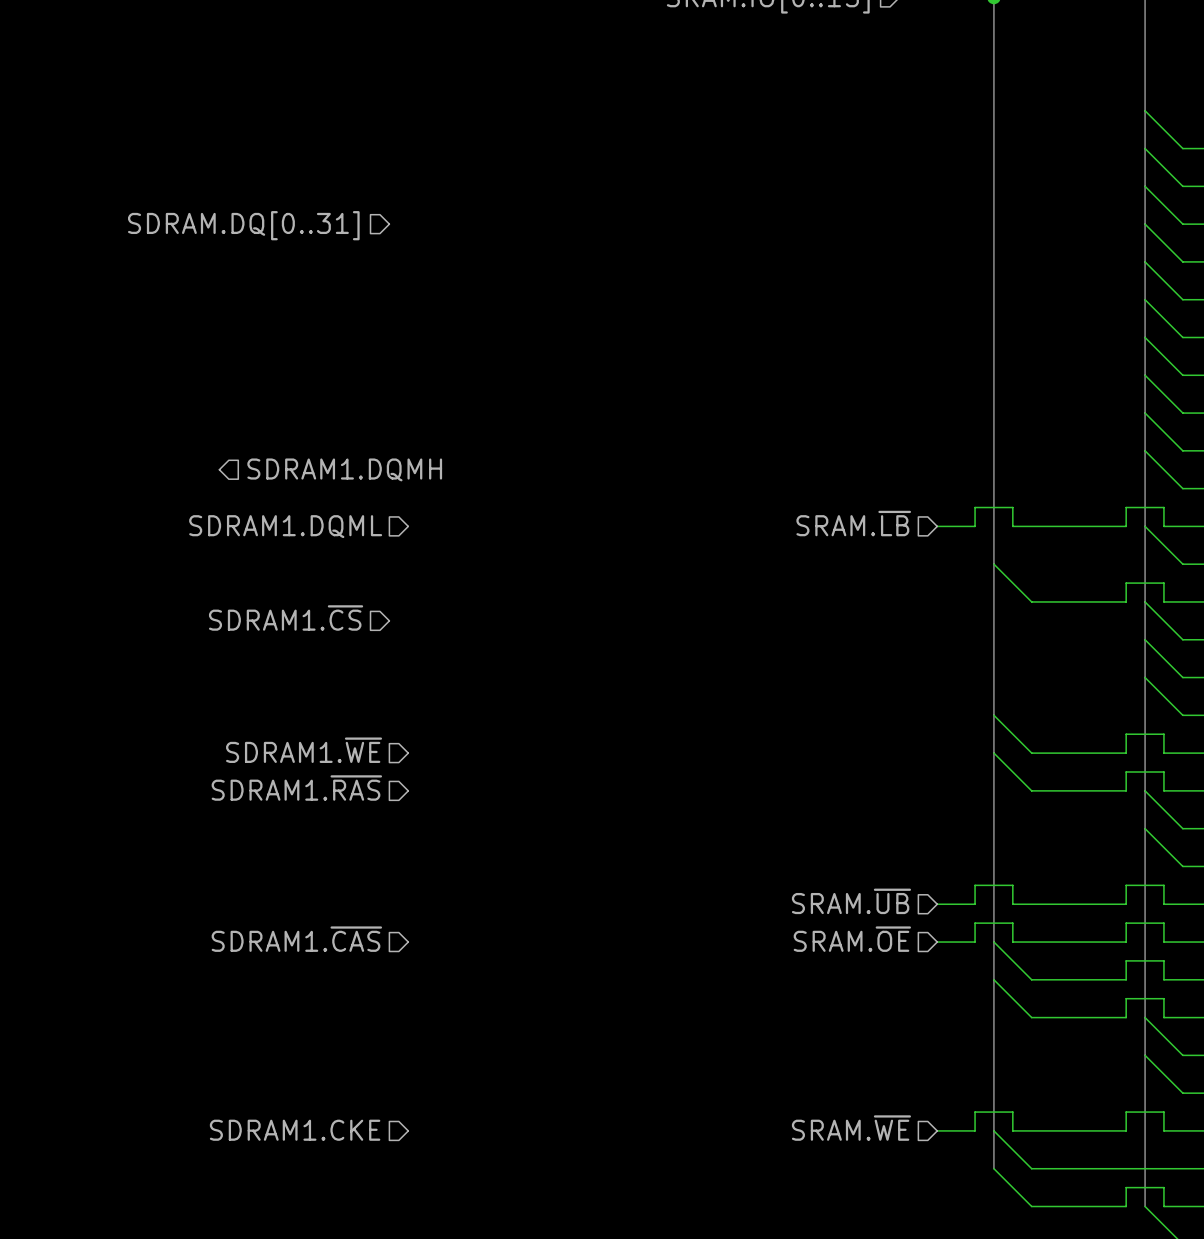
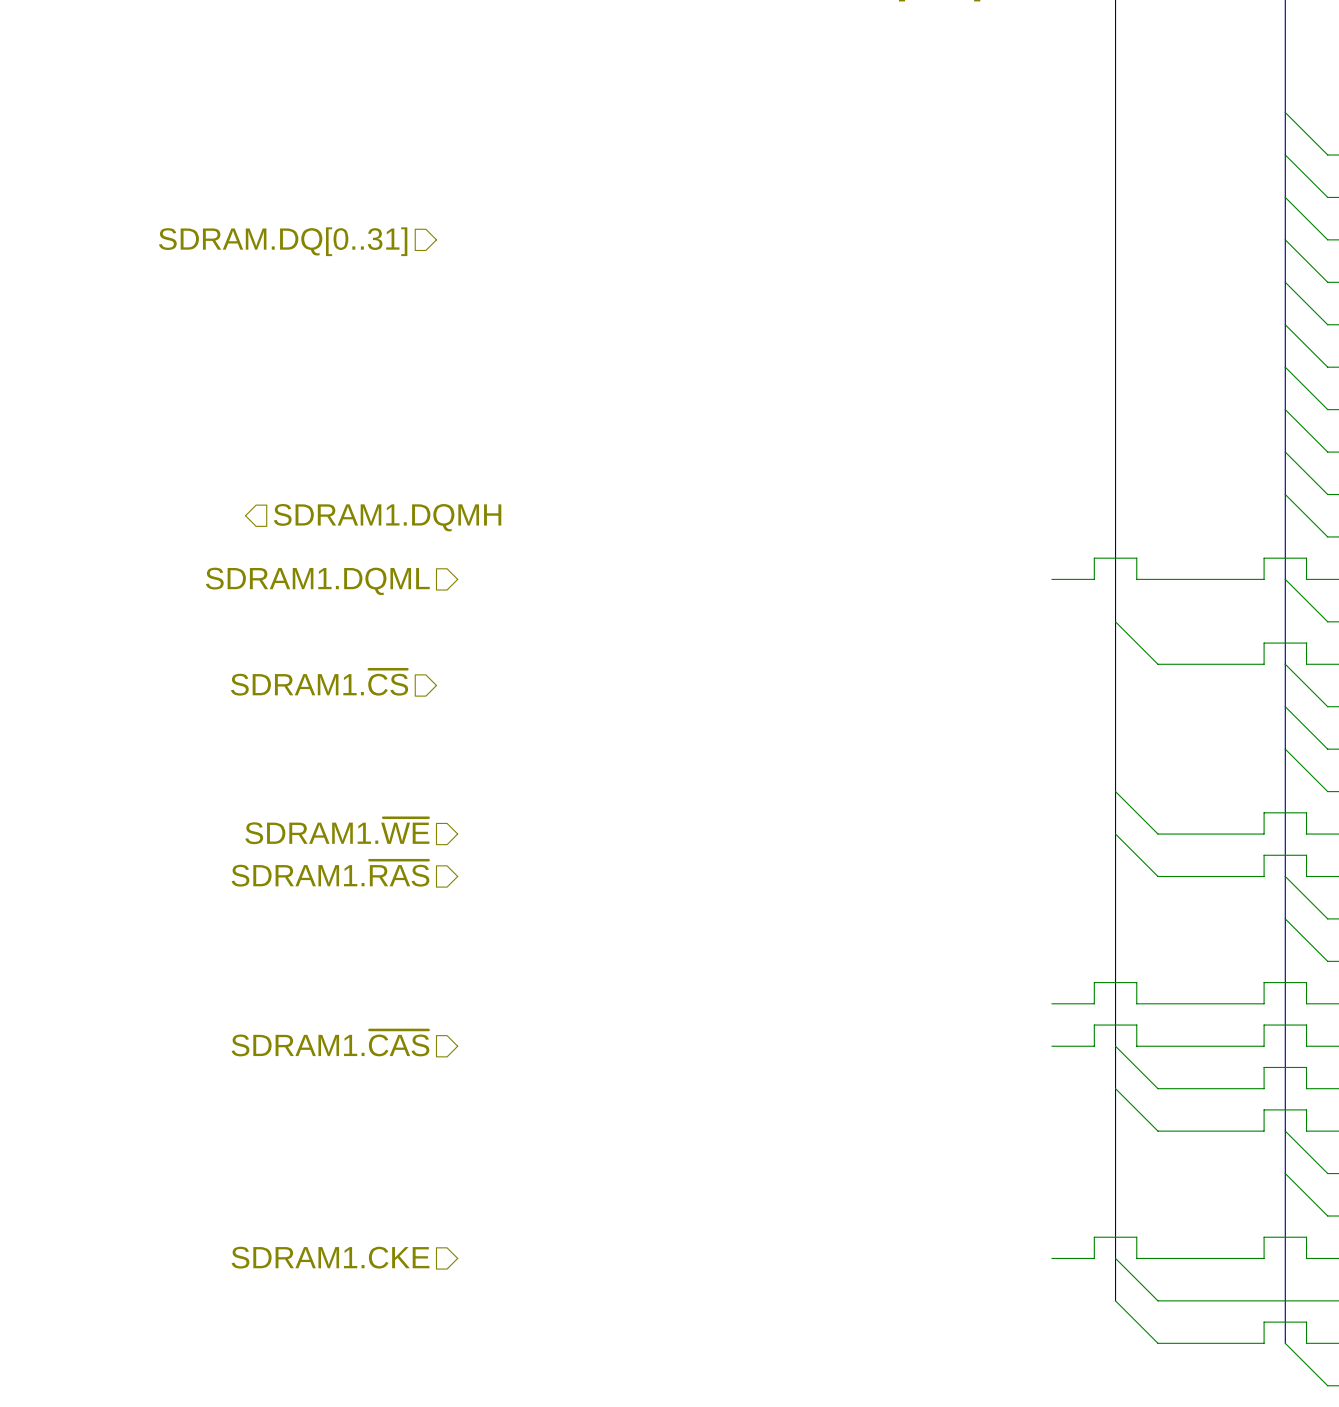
hierarchical label: SRAM.~{LB} (853, 523) -> none
hierarchical label: SRAM.~{UB} (851, 901) -> none
hierarchical label: SRAM.~{OE} (852, 939) -> none
hierarchical label: SRAM.~{WE} (851, 1128) -> none

